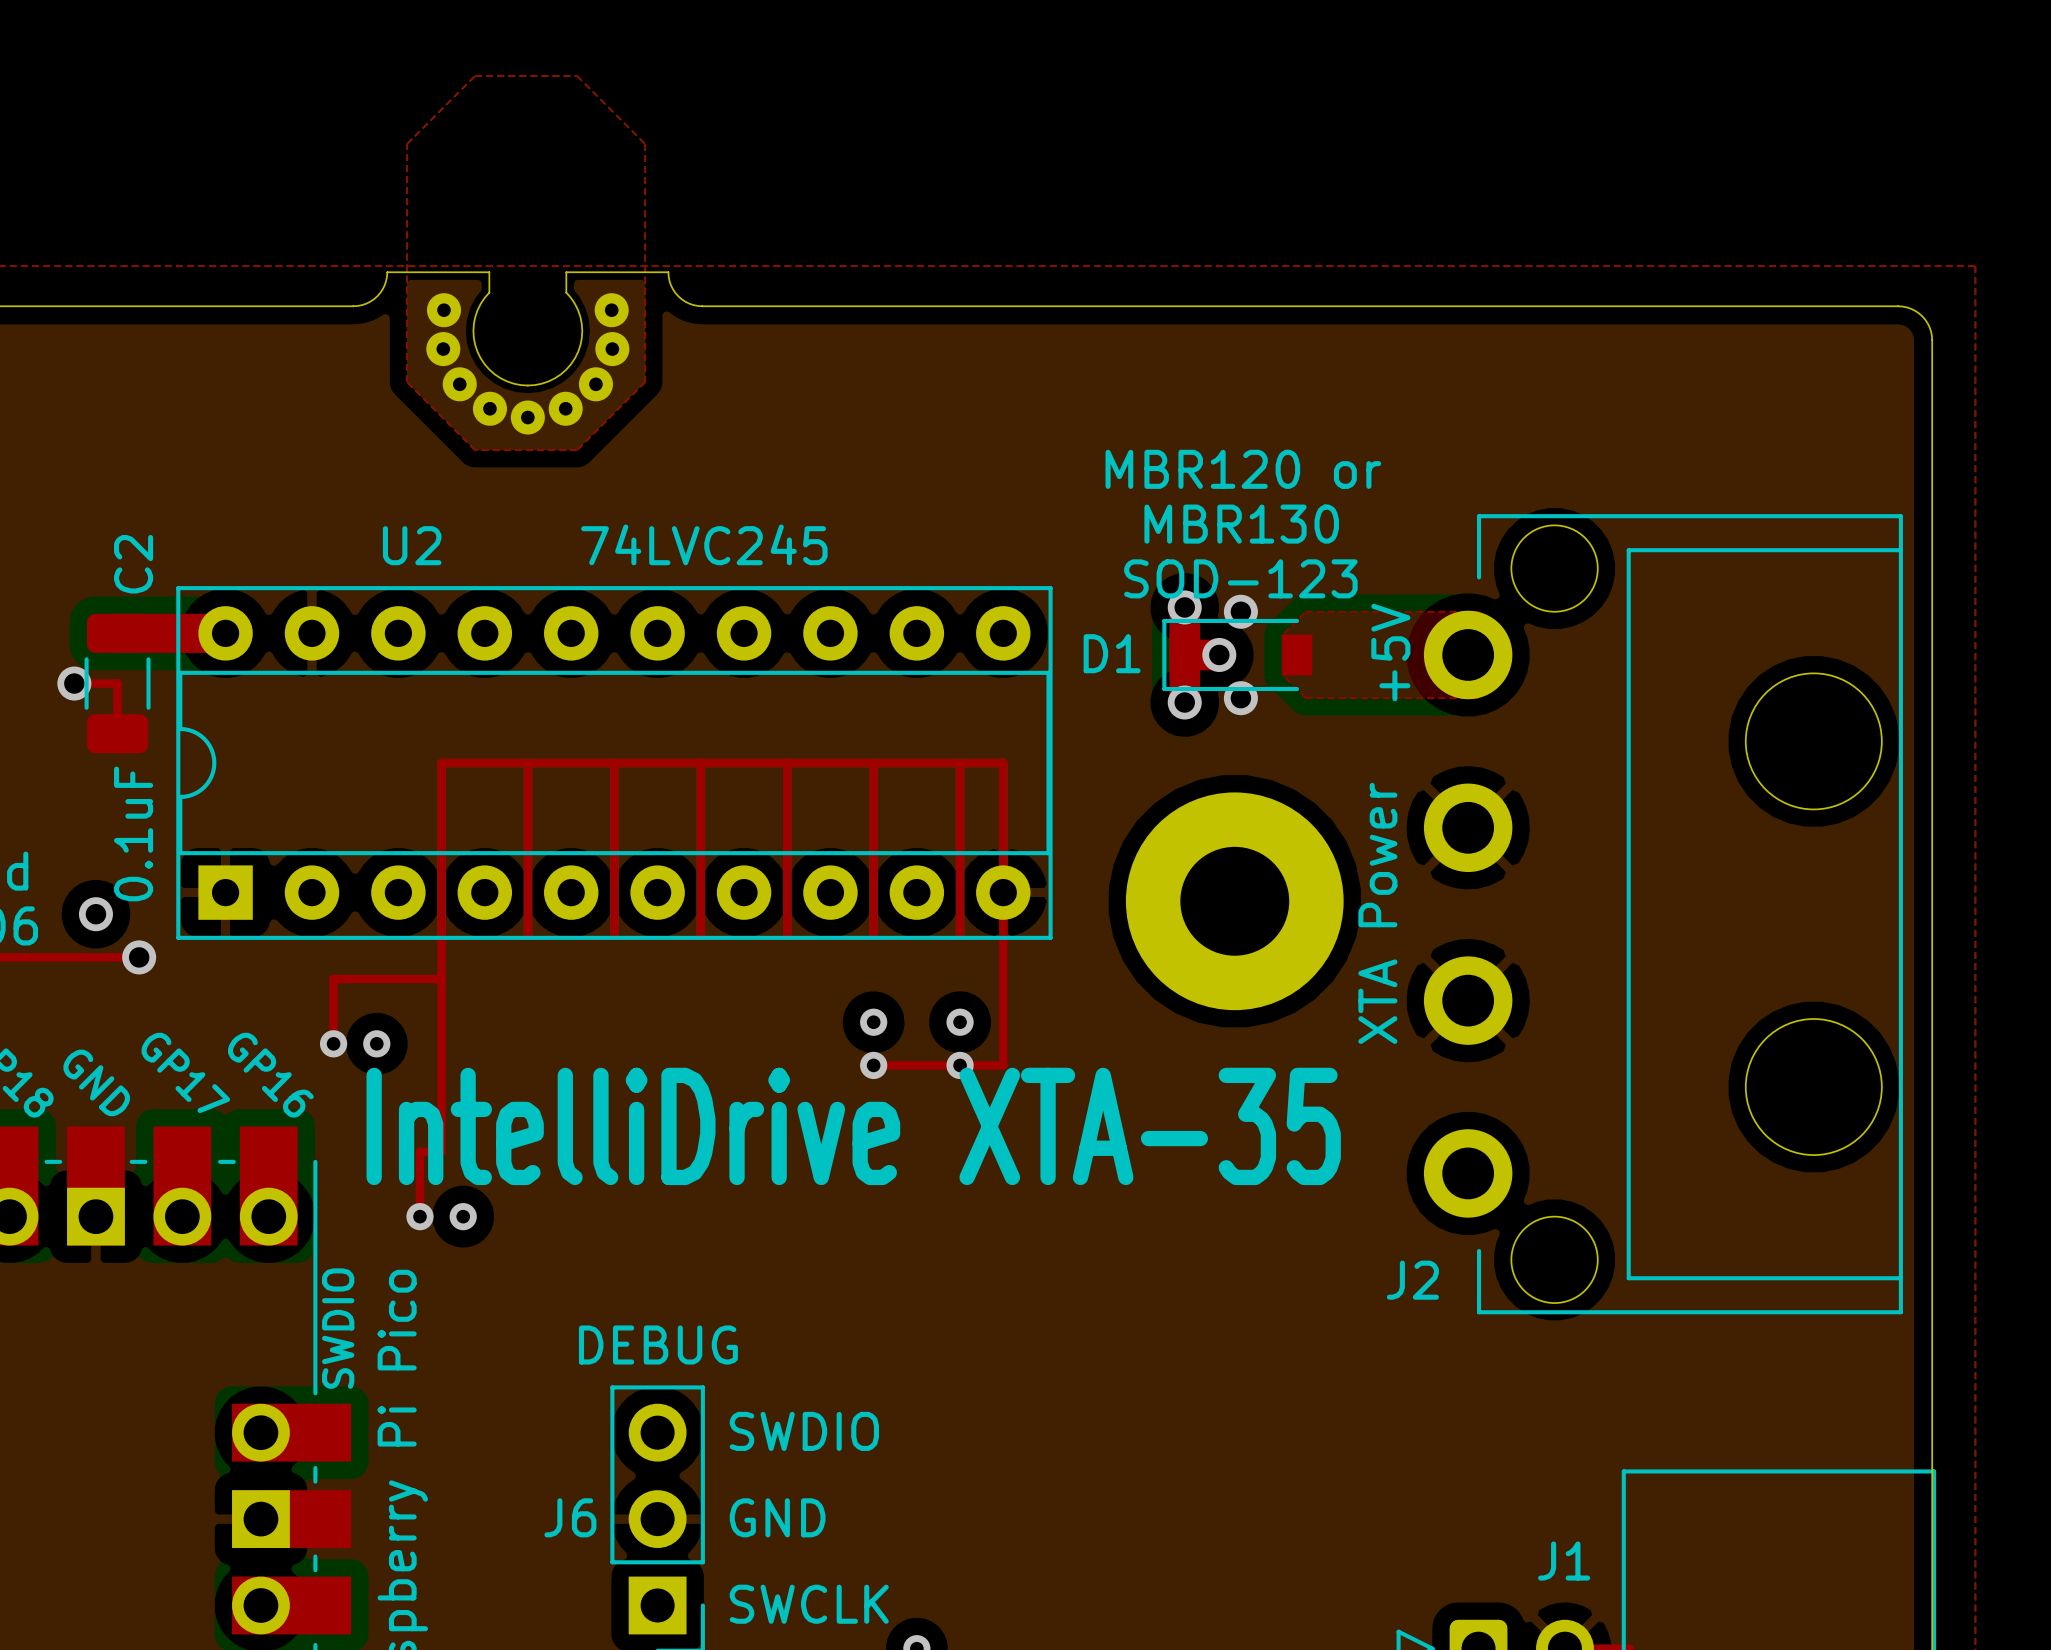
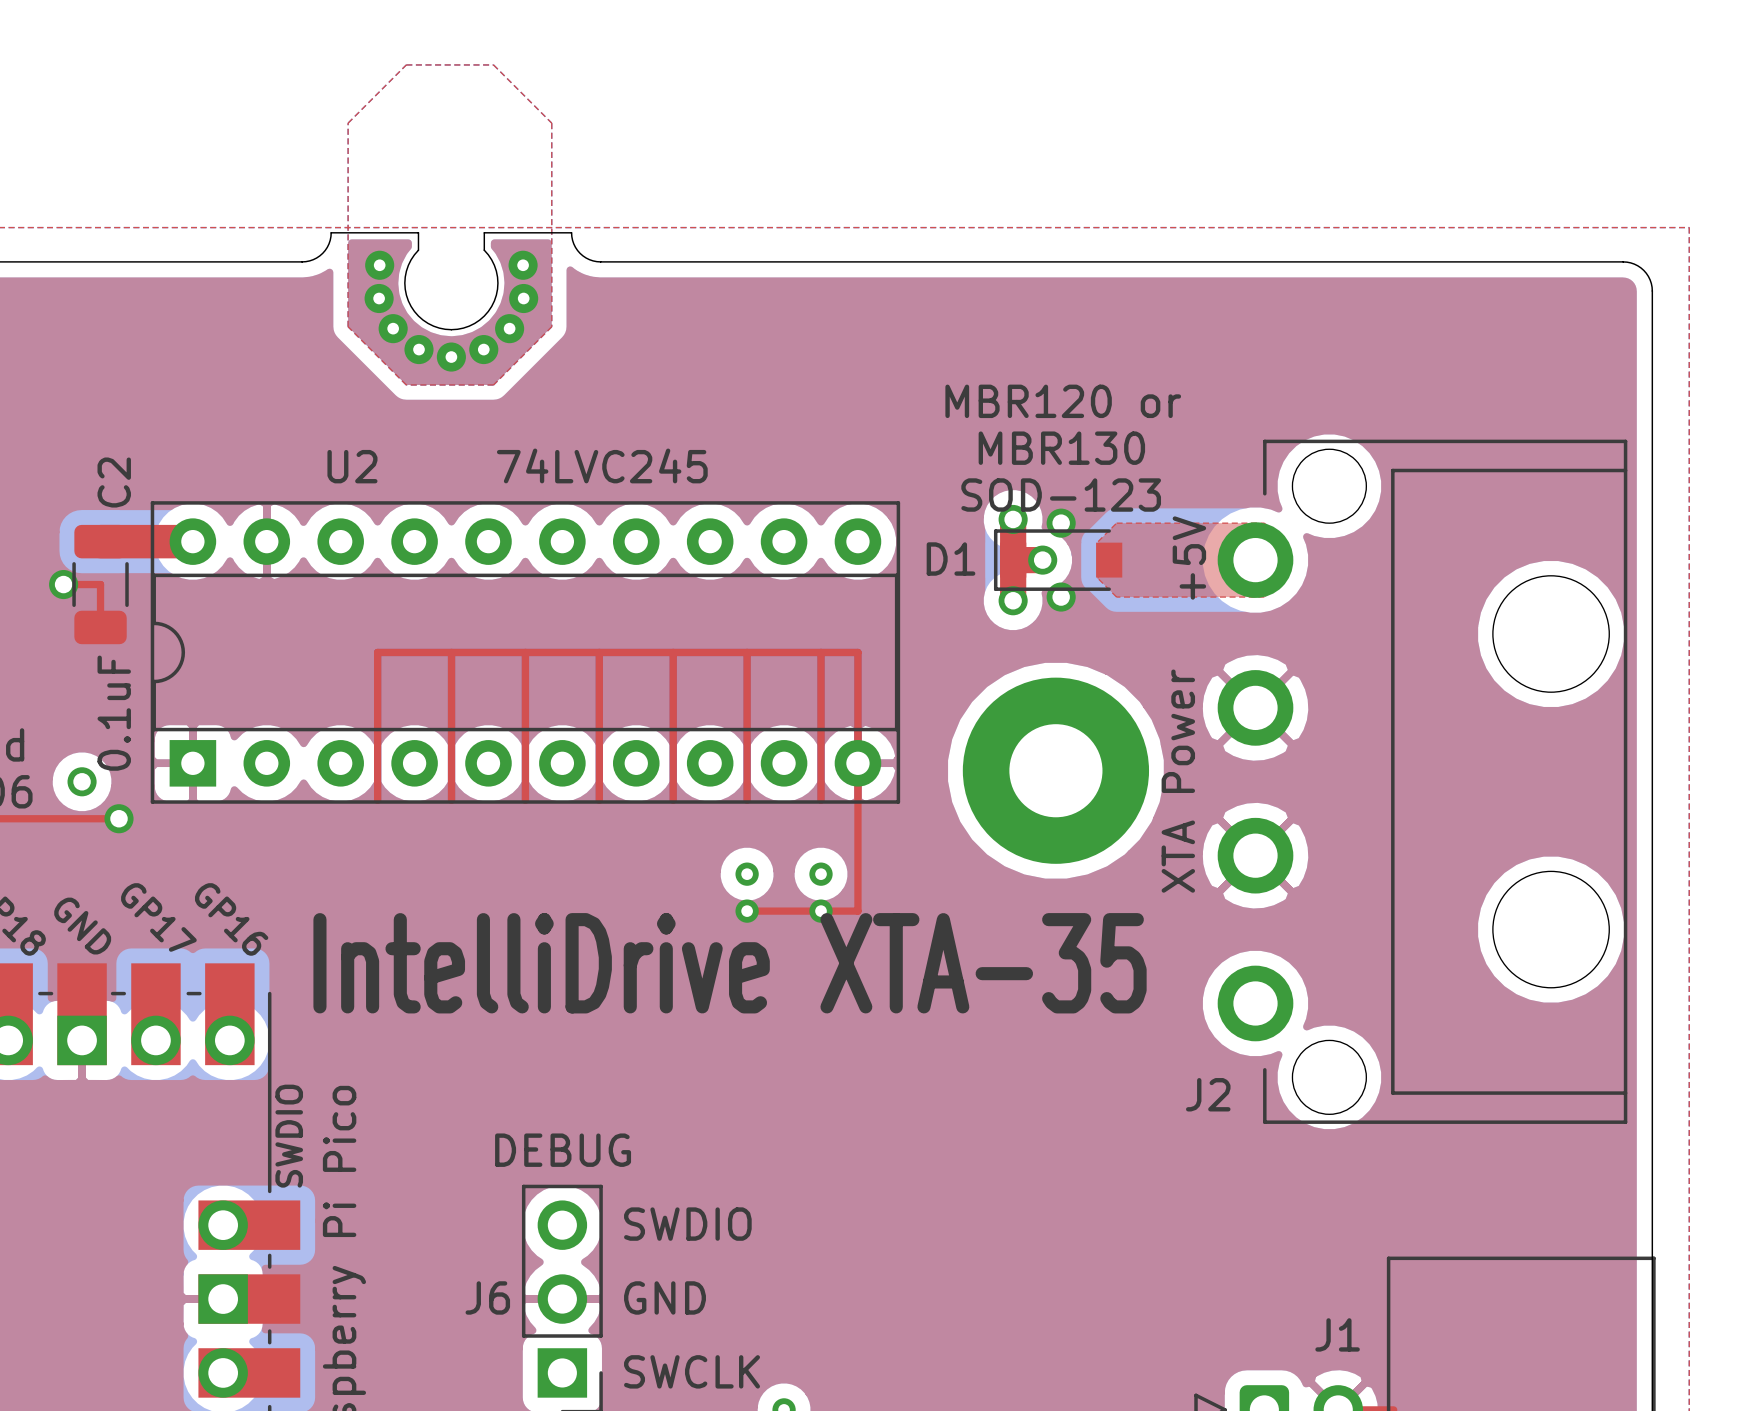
top track: (441, 935) (441, 1151) (420, 1151) (420, 1216) -> none
top track: (441, 979) (333, 979) (333, 1043) -> none
via: (333, 1043) -> none
via: (376, 1043) -> none
via: (420, 1216) -> none
via: (463, 1216) -> none

